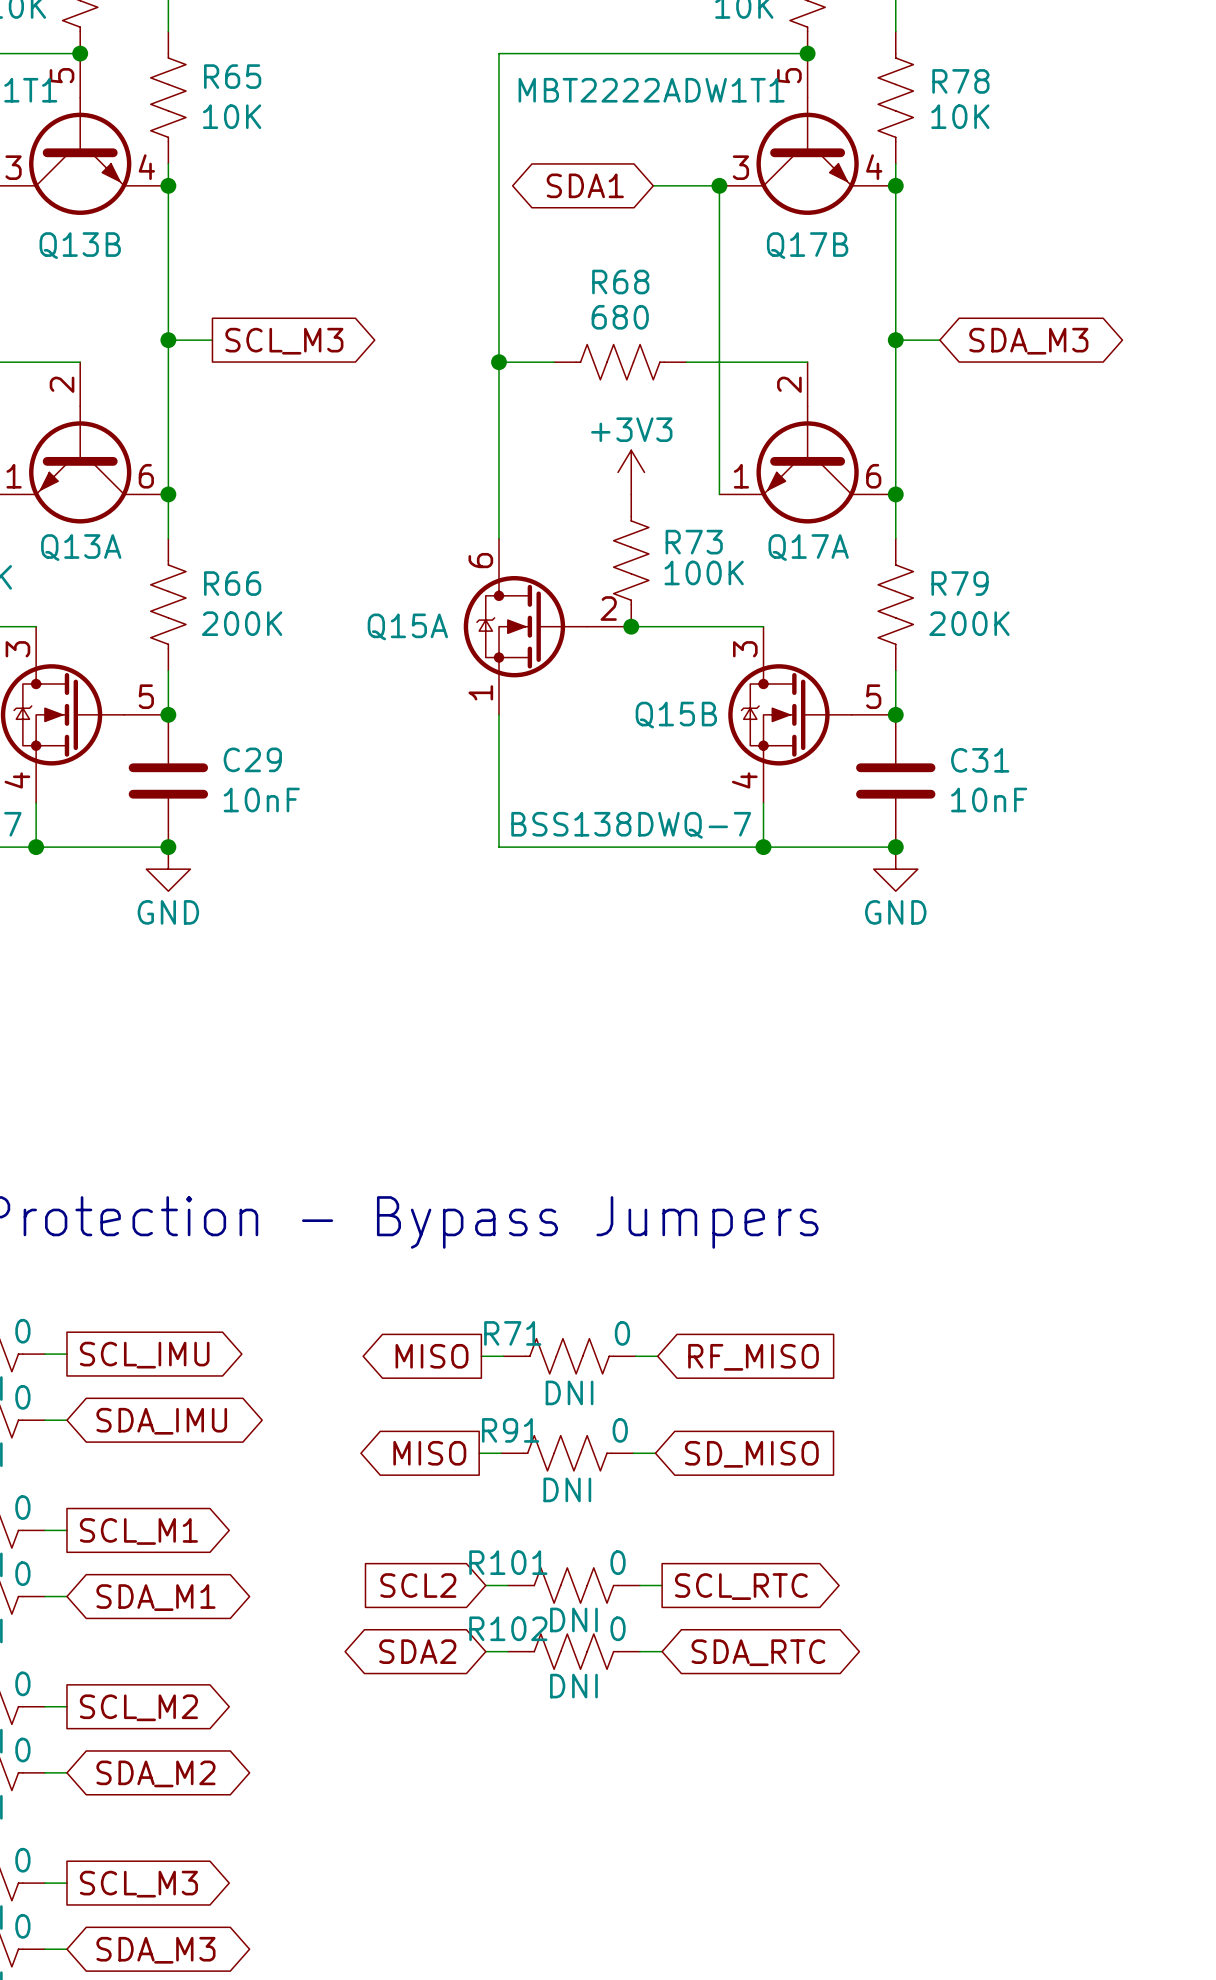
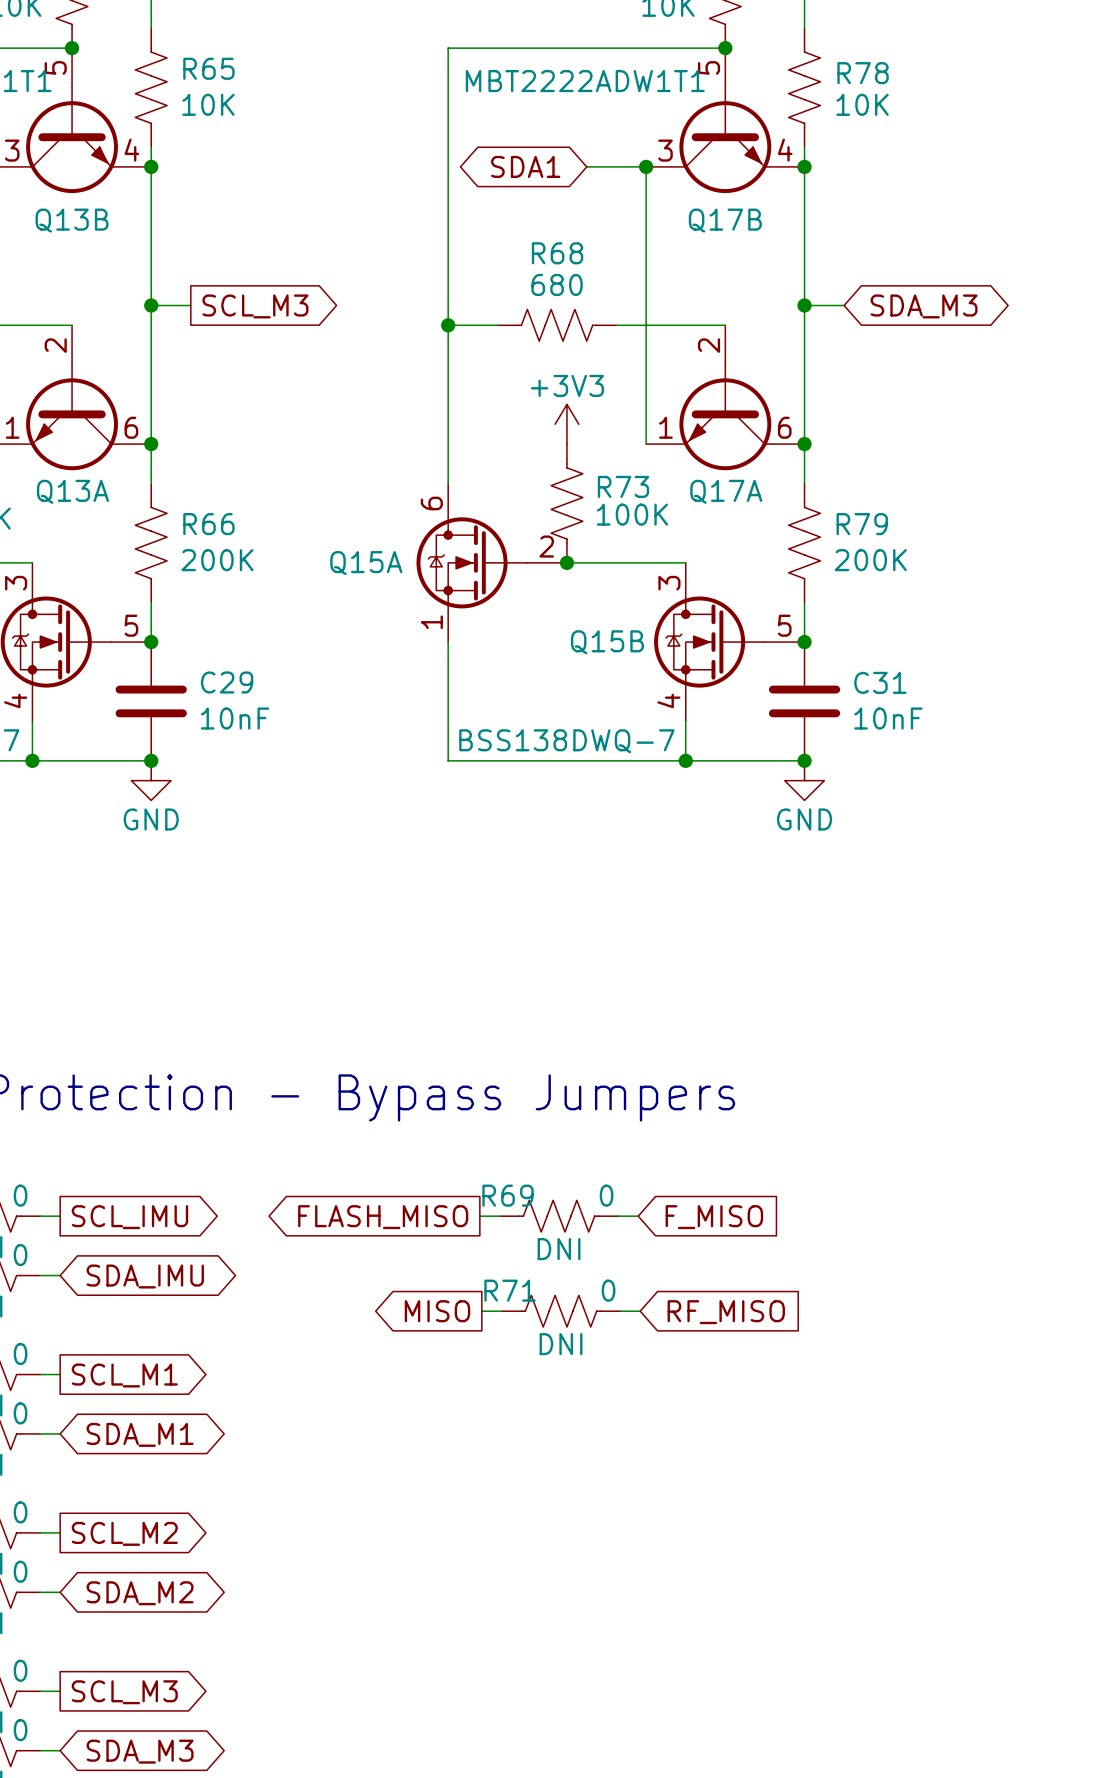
R69: none -> 0 (559, 1216)
global label: none -> FLASH_MISO (383, 1217)
global label: none -> F_MISO (714, 1217)
global label: MISO (432, 1356) -> none
wire: (481, 1356) (503, 1356) -> (479, 1216) (499, 1216)
R71 position: (569, 1356) -> (561, 1311)
wire: (635, 1356) (657, 1356) -> (618, 1216) (638, 1216)
global label position: RF_MISO (753, 1357) -> RF_MISO (726, 1312)
global label position: MISO (429, 1453) -> MISO (437, 1311)
wire: (479, 1453) (501, 1453) -> (481, 1311) (501, 1311)
R91: 0 (567, 1453) -> none
wire: (633, 1453) (655, 1453) -> (620, 1311) (640, 1311)
global label: SD_MISO (751, 1454) -> none
global label: SCL2 (418, 1585) -> none
wire: (485, 1585) (507, 1585) -> none
R101: 0 (573, 1585) -> none
wire: (640, 1585) (662, 1585) -> none
global label: SCL_RTC (741, 1586) -> none
global label: SDA2 (417, 1651) -> none
wire: (485, 1651) (507, 1651) -> none
R102: 0 (573, 1651) -> none
wire: (640, 1651) (662, 1651) -> none
global label: SDA_RTC (758, 1652) -> none

